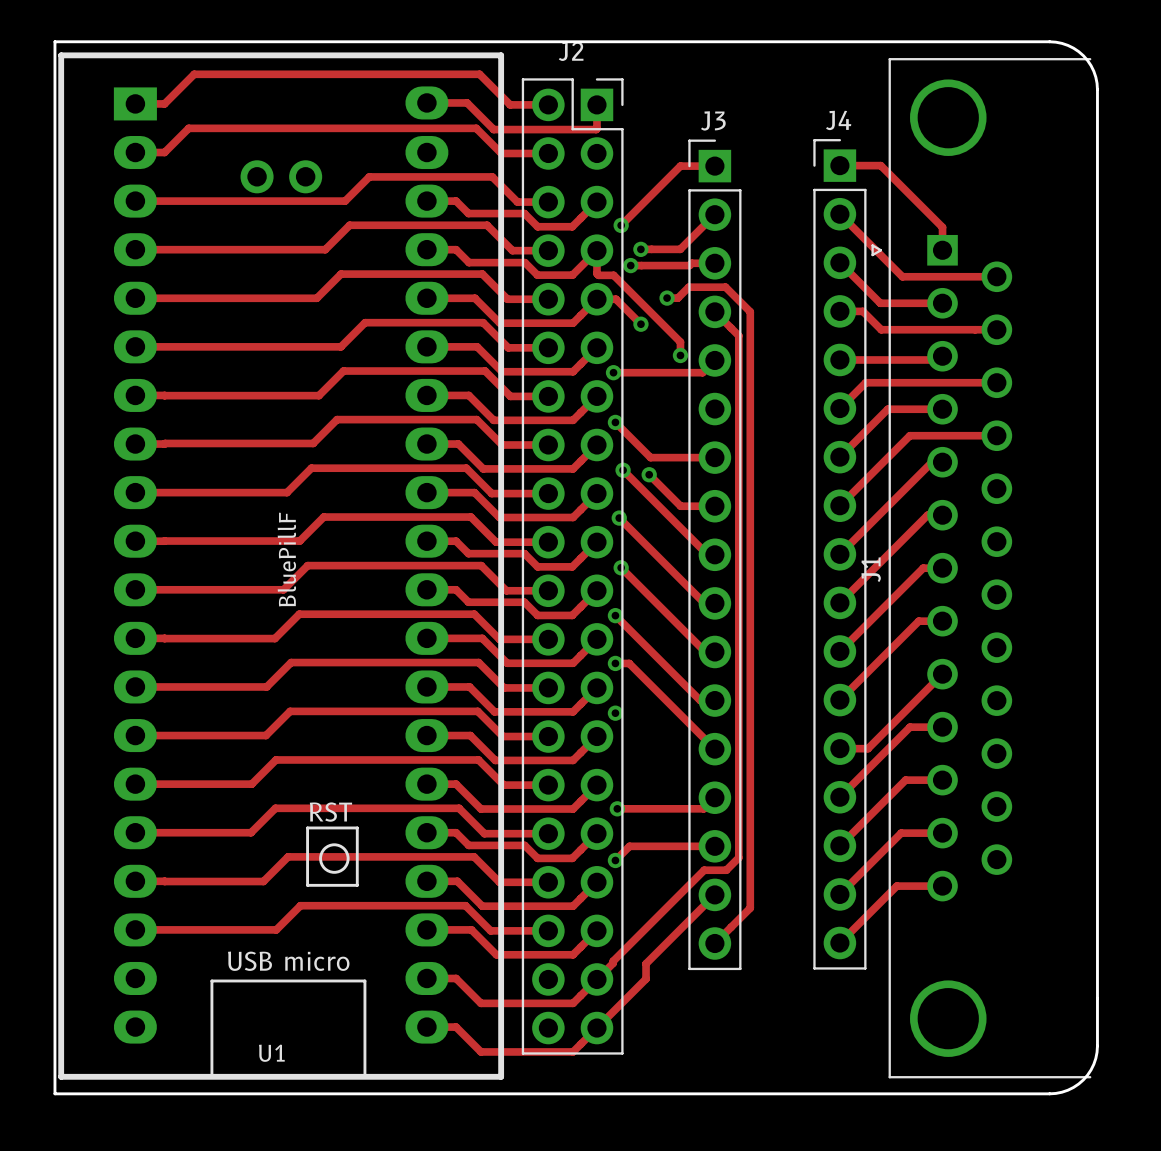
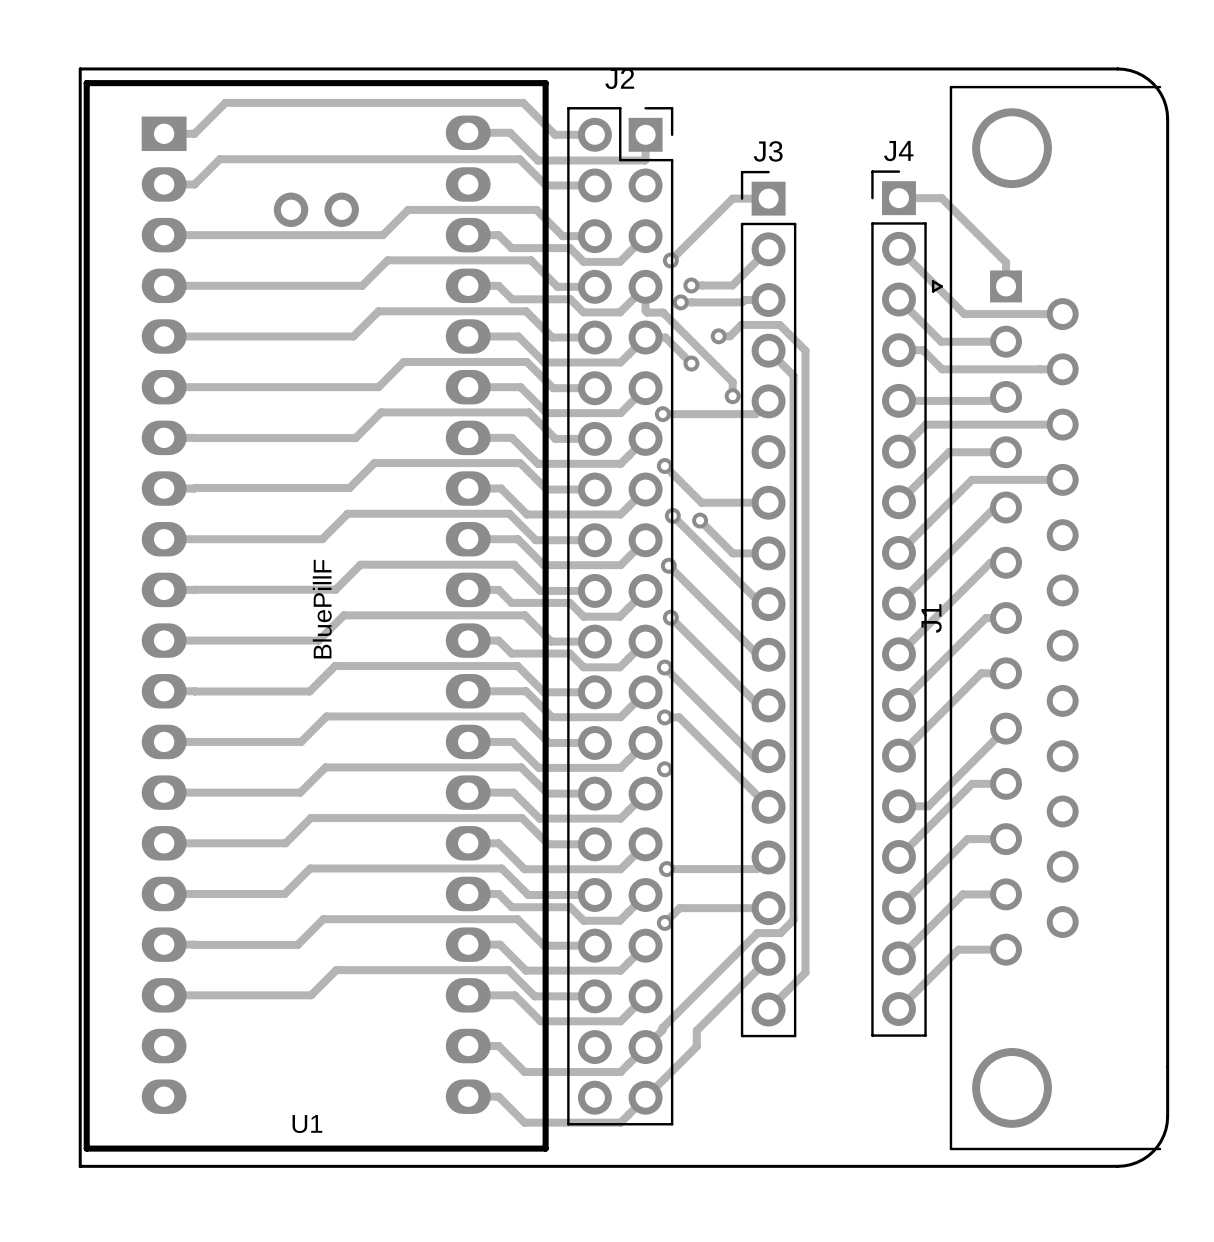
U1 footprint: [58, 52, 505, 1080] -> [83, 80, 549, 1152]

